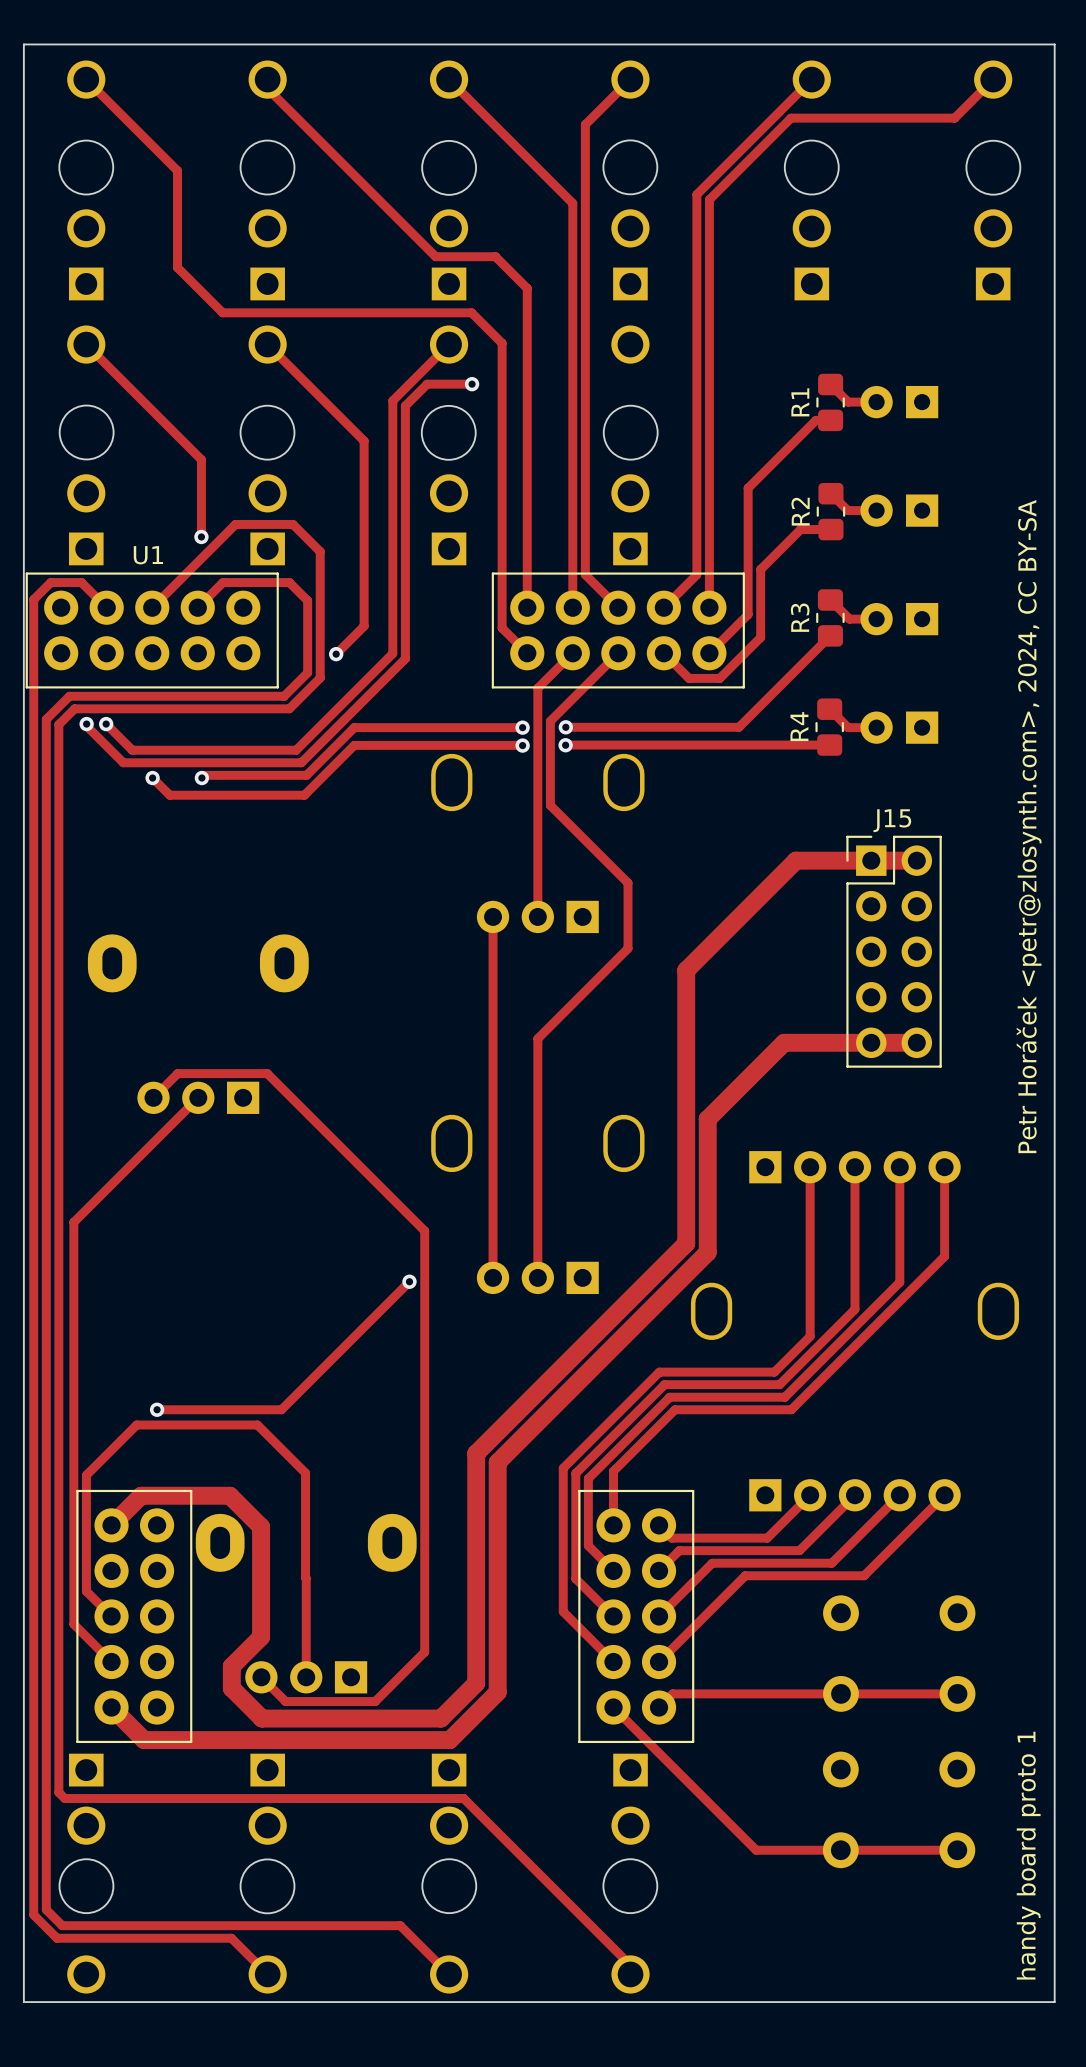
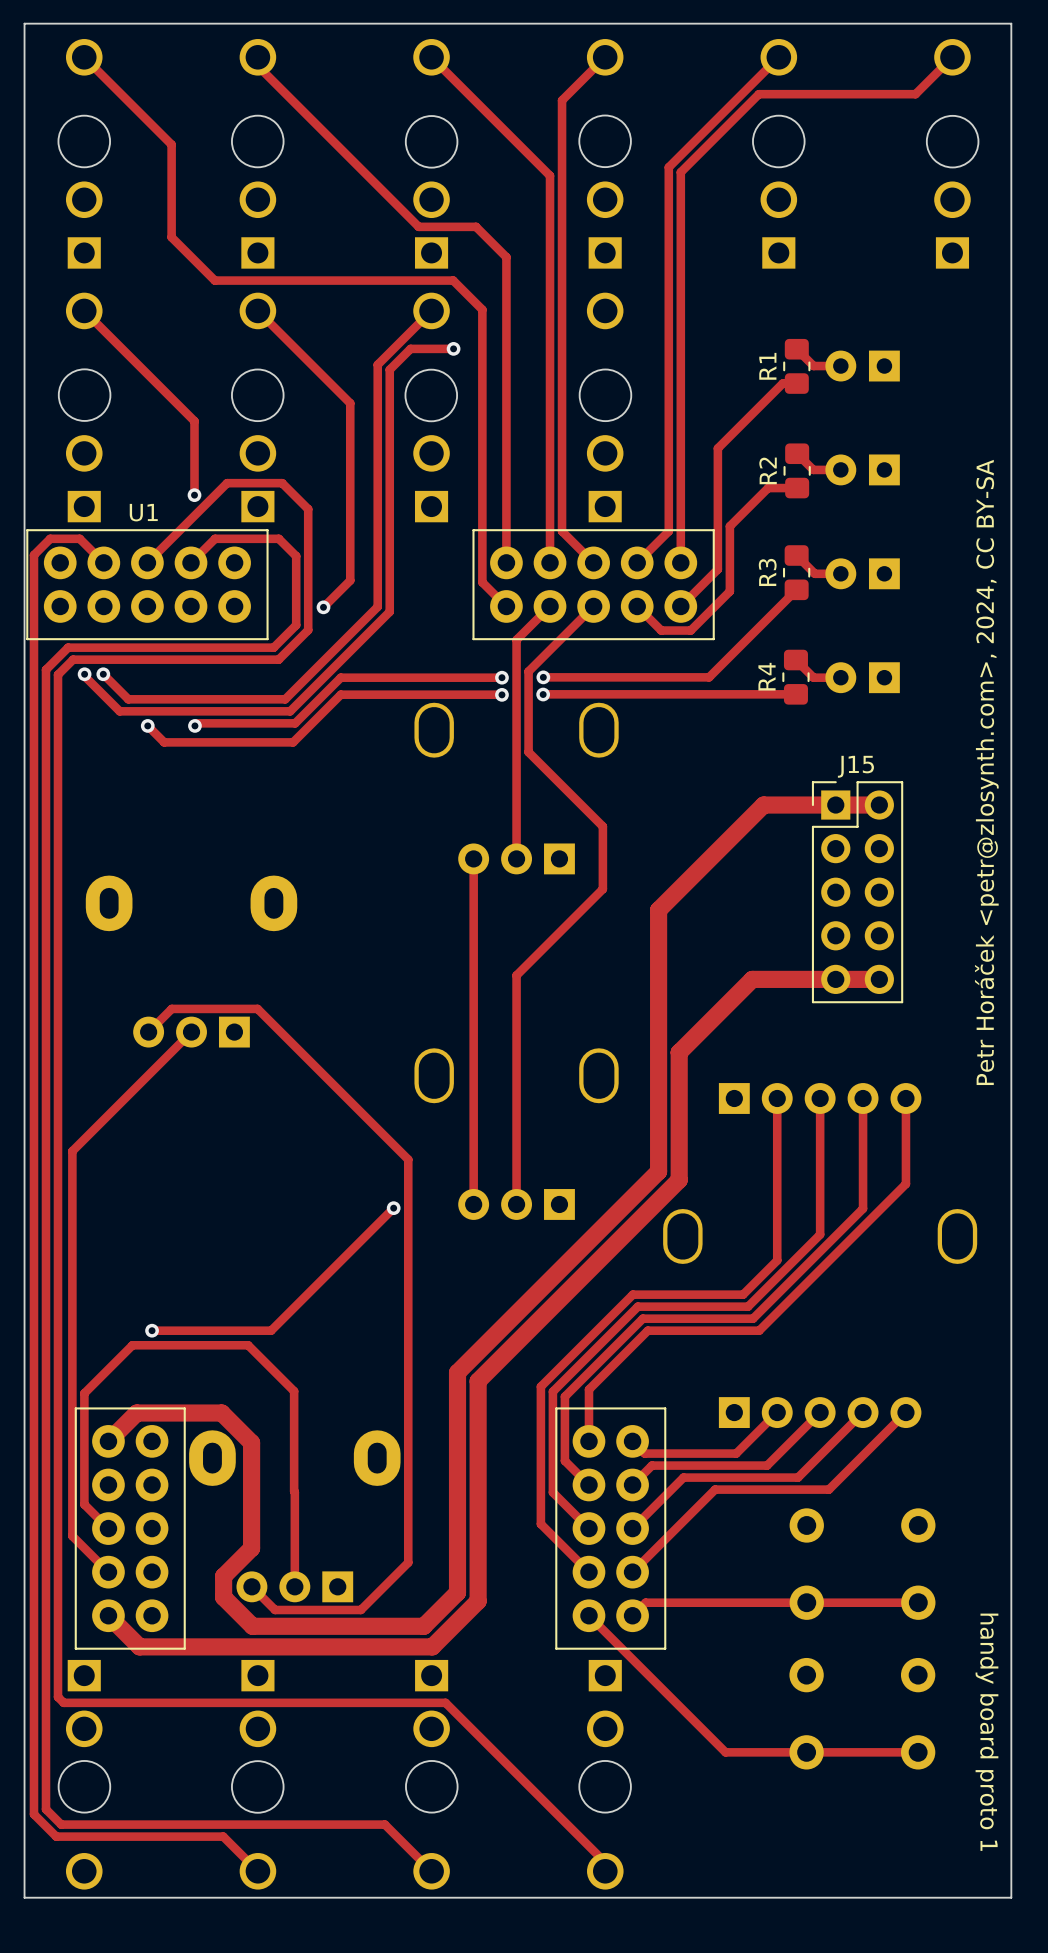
text rotation: 0° (1028, 1855) -> 180° (986, 1732)

